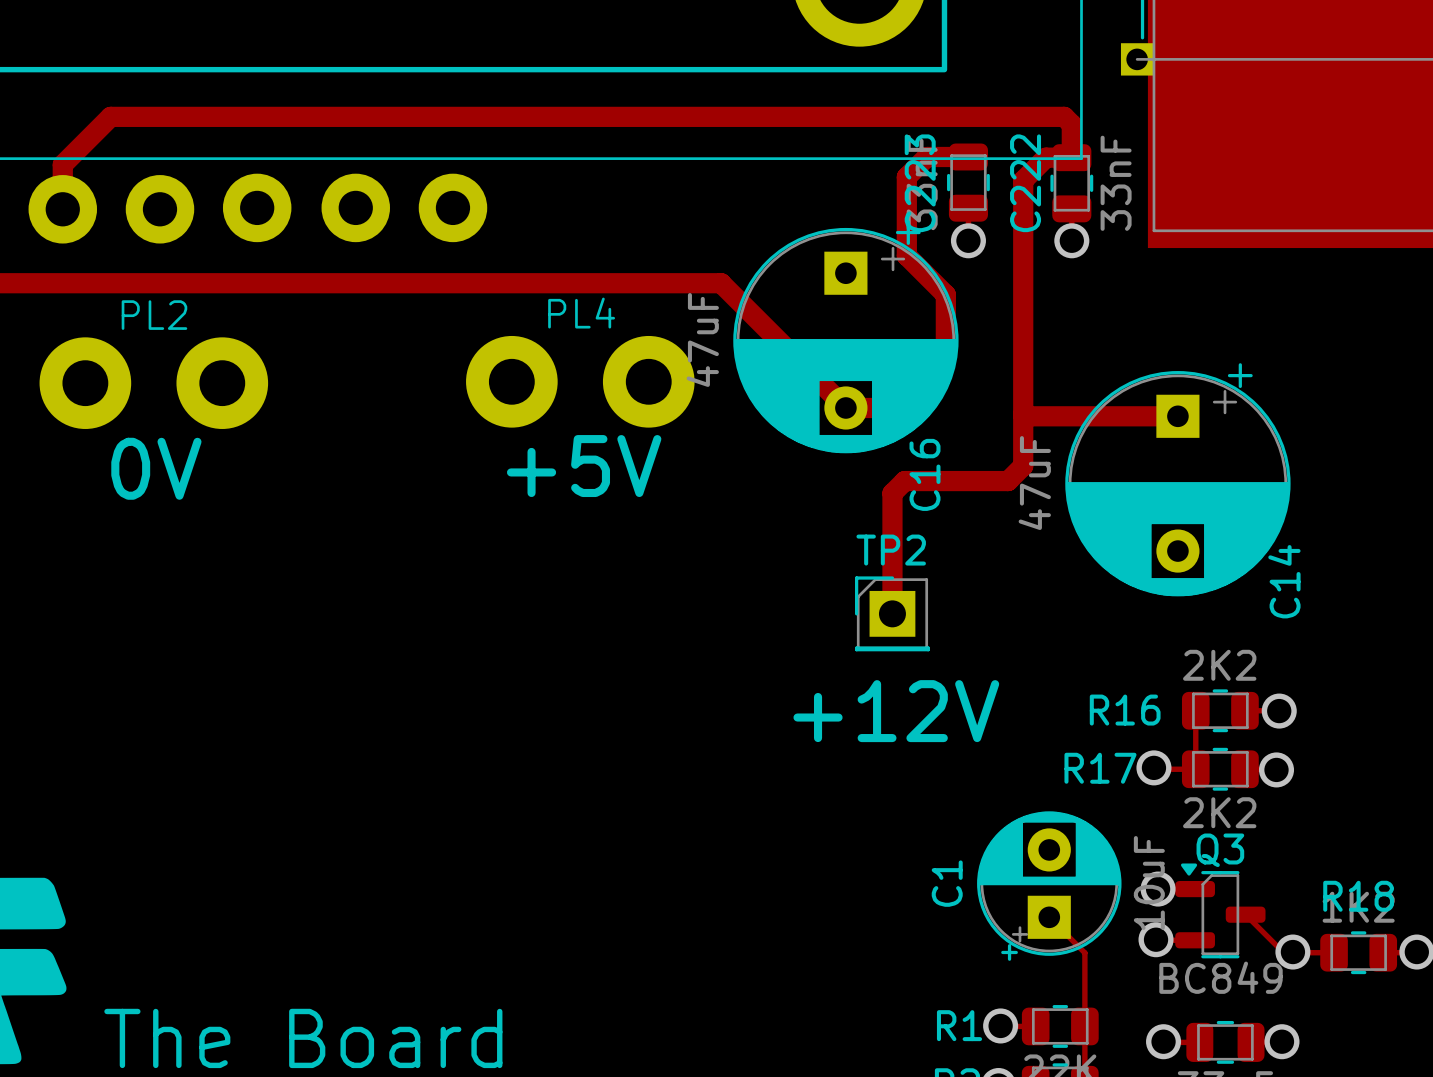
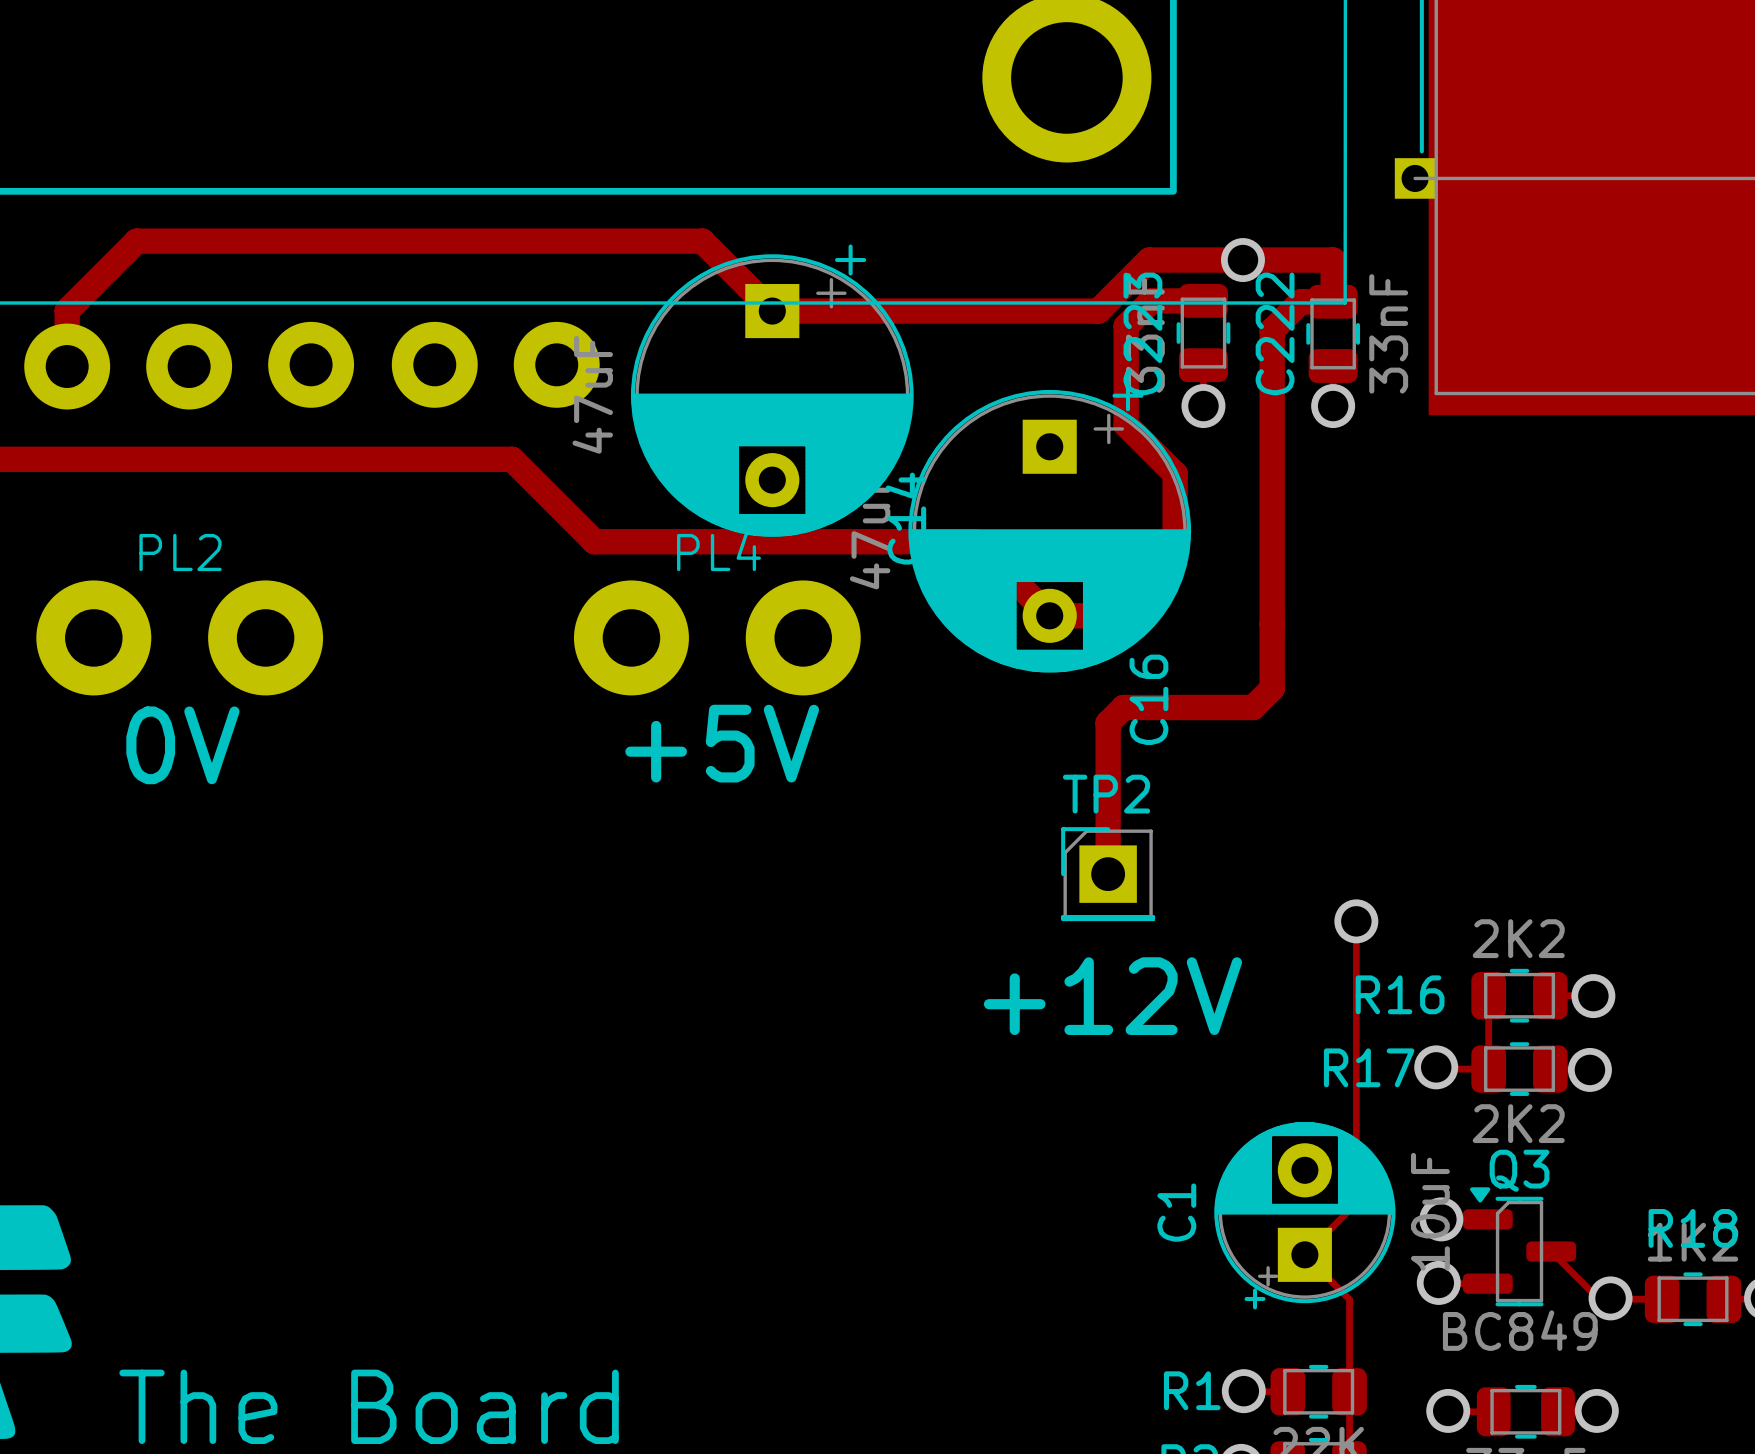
track: (110, 116) (1064, 116) (1071, 124) -> (127, 250) (136, 241) (702, 241) (772, 311) (1098, 311) (1149, 260) (1333, 260)
via: none -> (1242, 260)
track: (417, 283) (721, 283) (786, 348) -> (512, 459) (594, 541) (975, 541)
PL4 position: (580, 381) -> (717, 637)
PL2 position: (153, 383) -> (179, 637)
track: (1023, 414) (1024, 416) (1177, 416) -> none
C14 position: (1177, 479) -> (772, 390)
track: none -> (1356, 921) (1356, 1203) (1304, 1254)
via: none -> (1356, 921)

